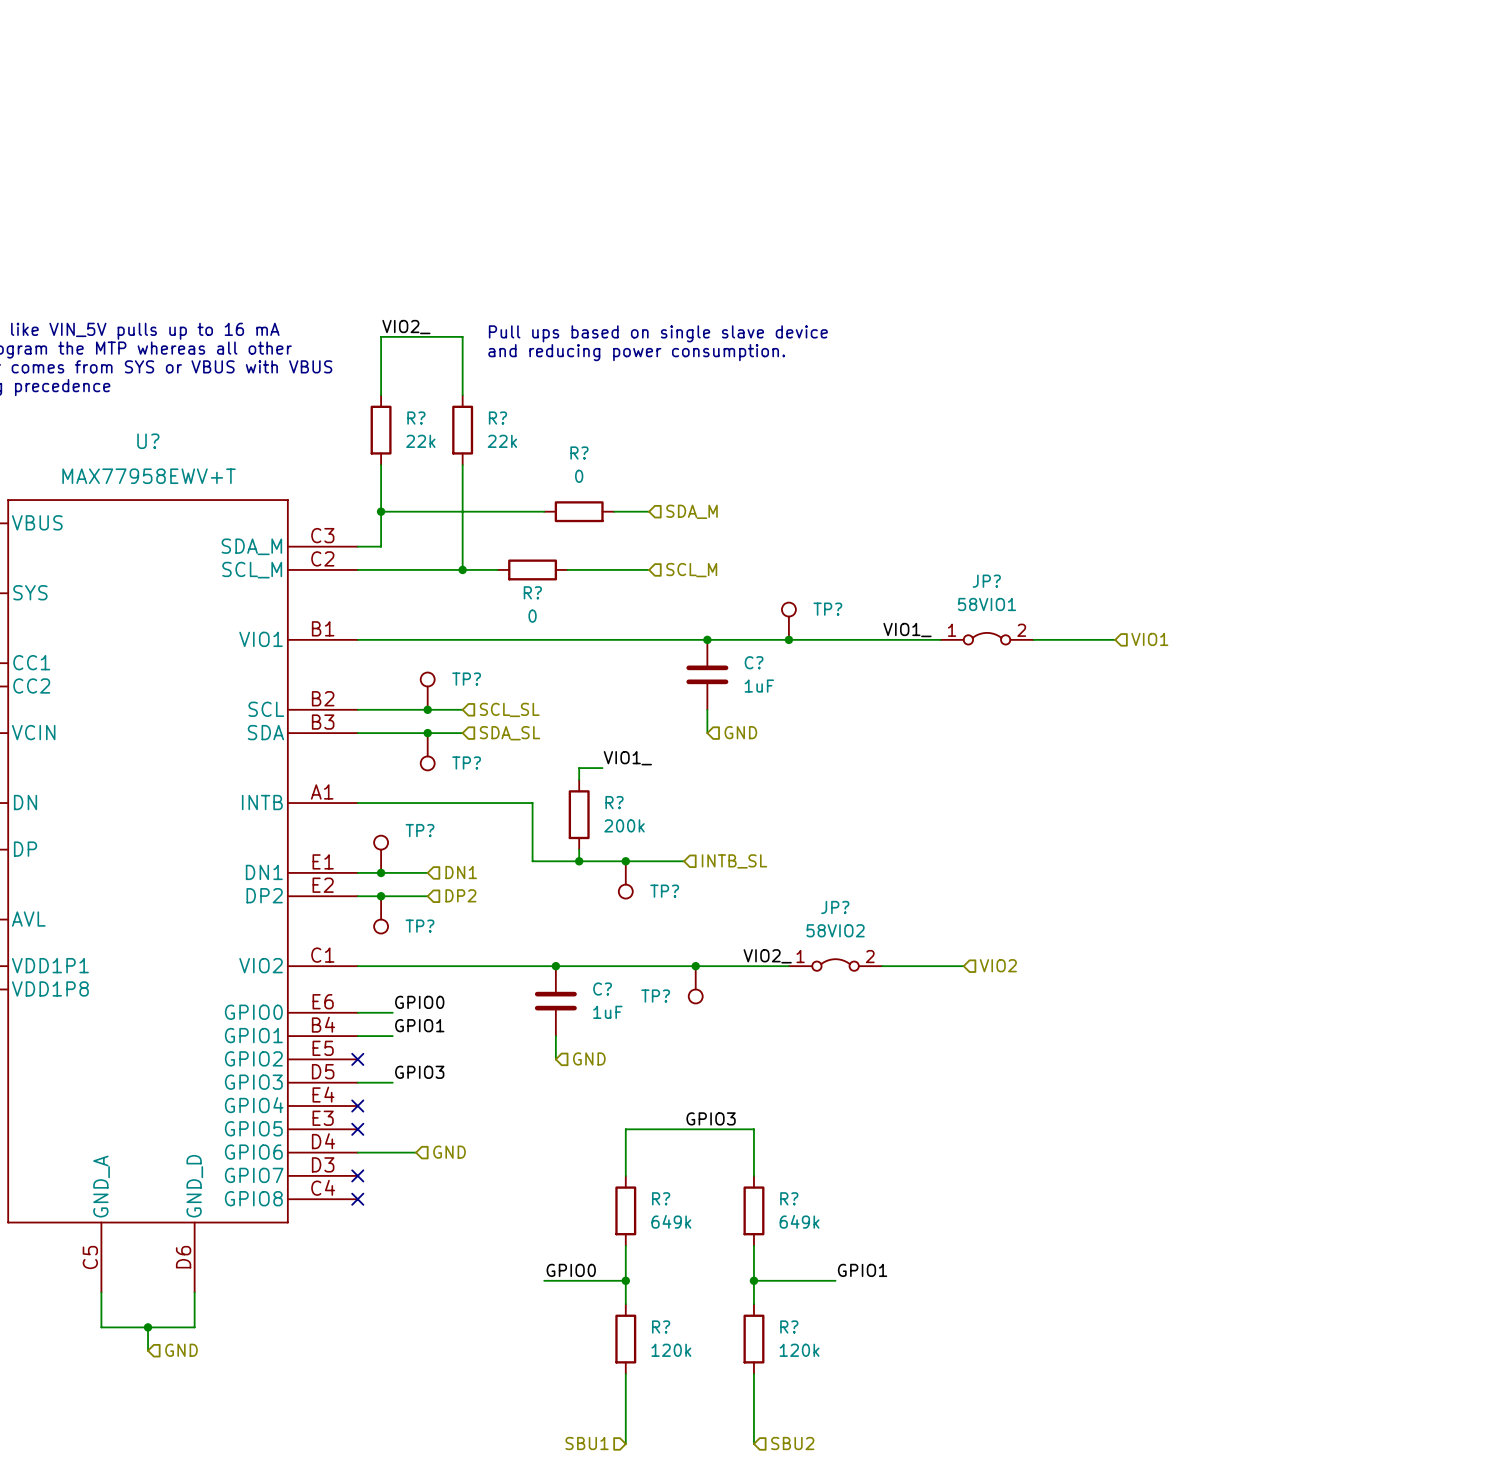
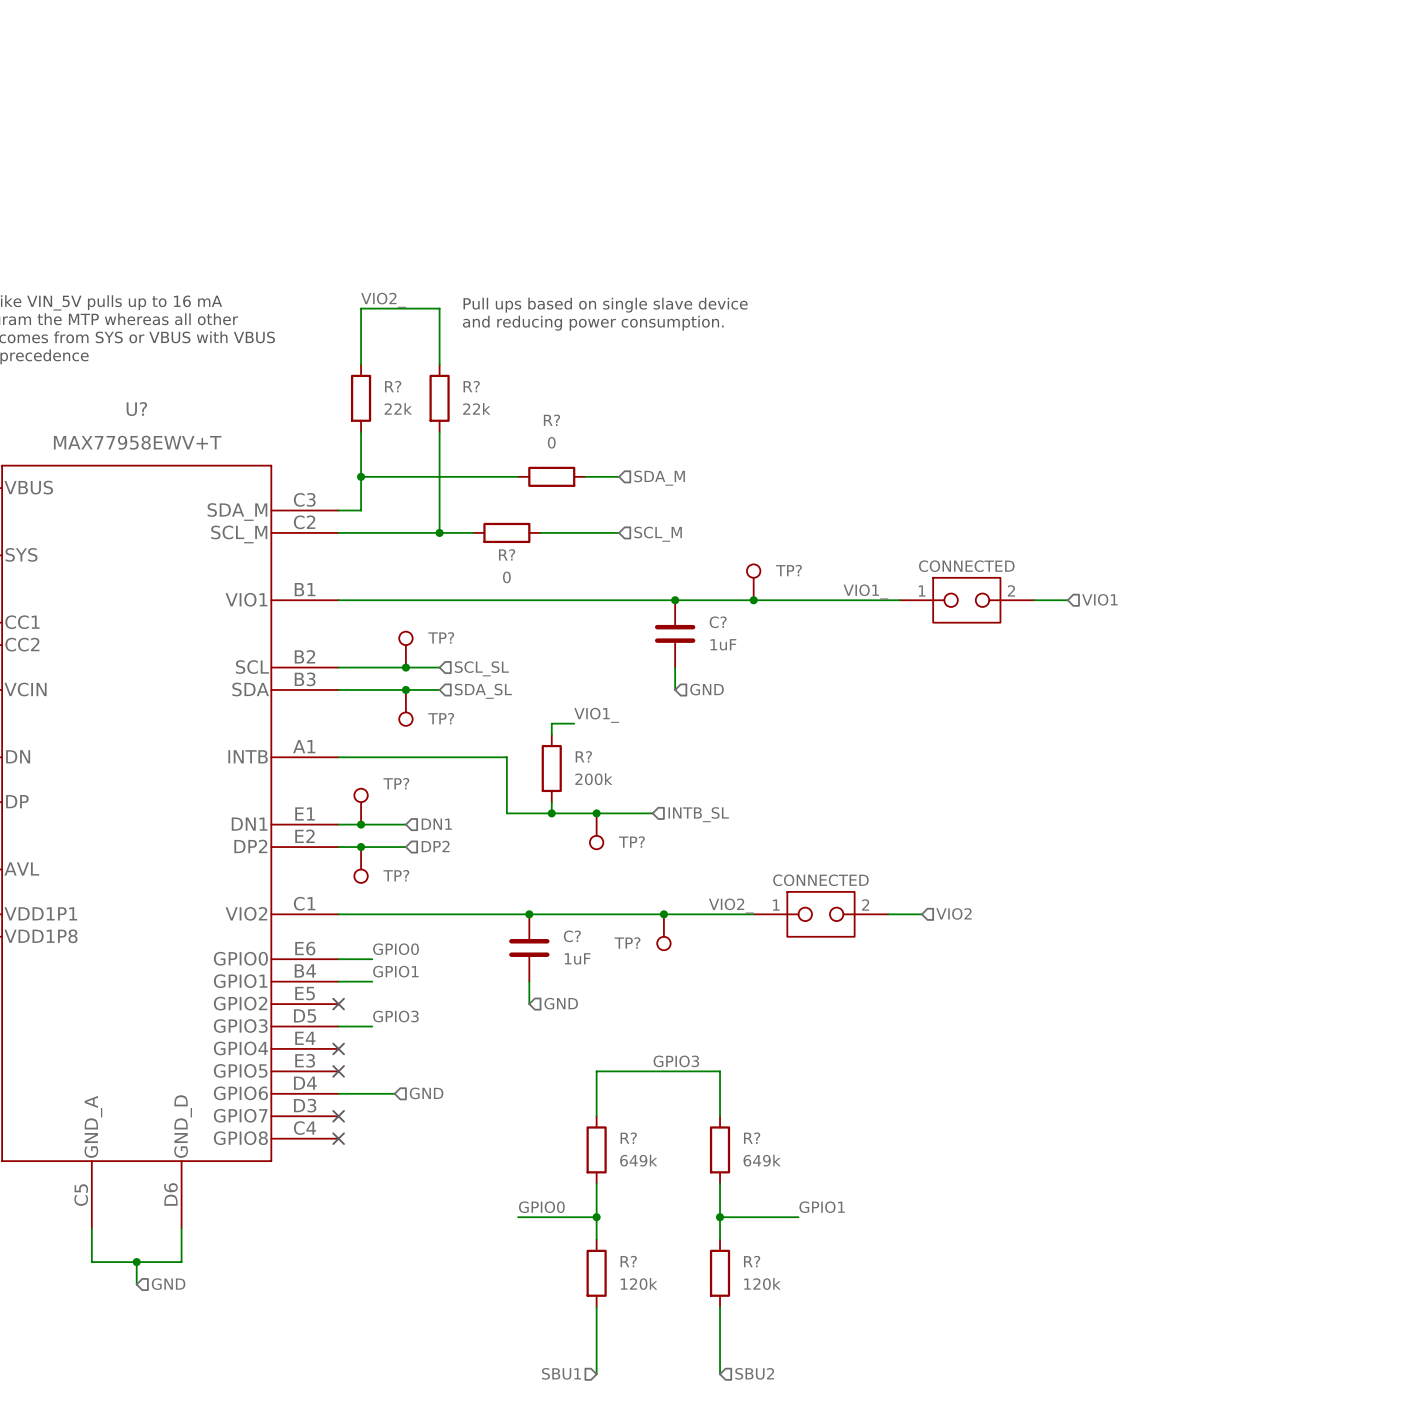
JP?: 58VIO1 (987, 638) -> none
part: none -> CONNECTED (966, 600)
JP?: 58VIO2 (835, 965) -> none
part: none -> CONNECTED (820, 914)

